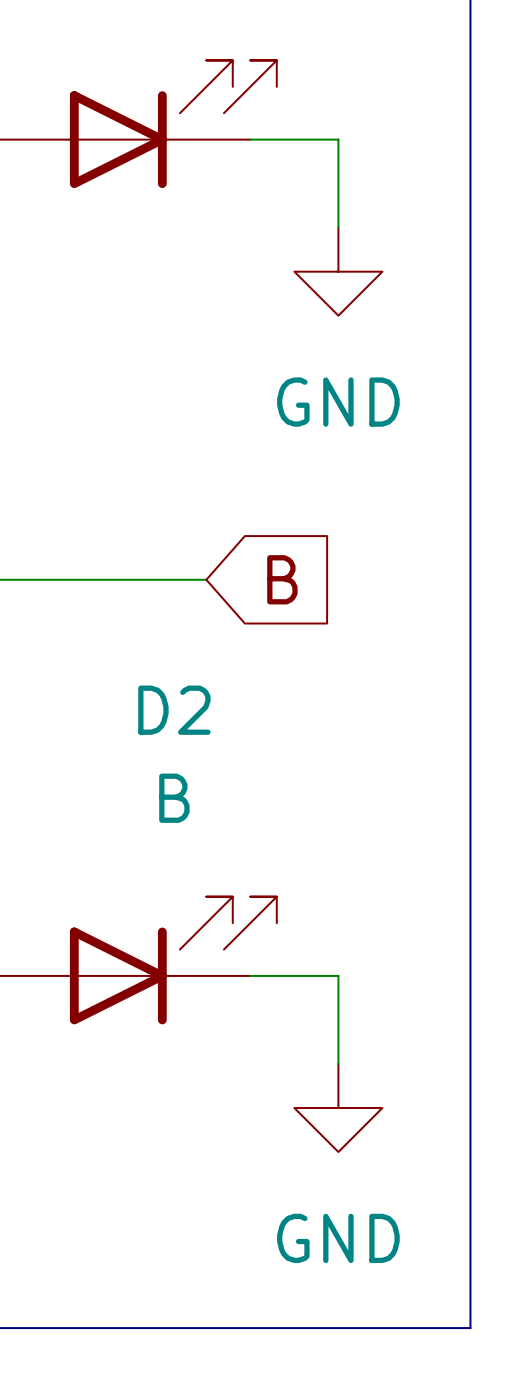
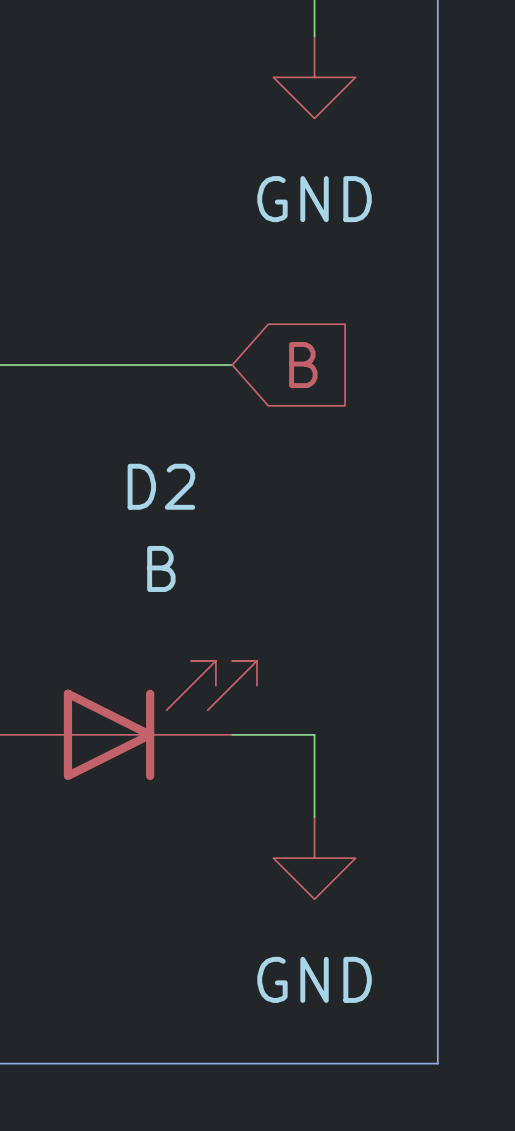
wire: none -> (191, 365) (232, 365)
global label position: B (282, 579) -> B (303, 365)

